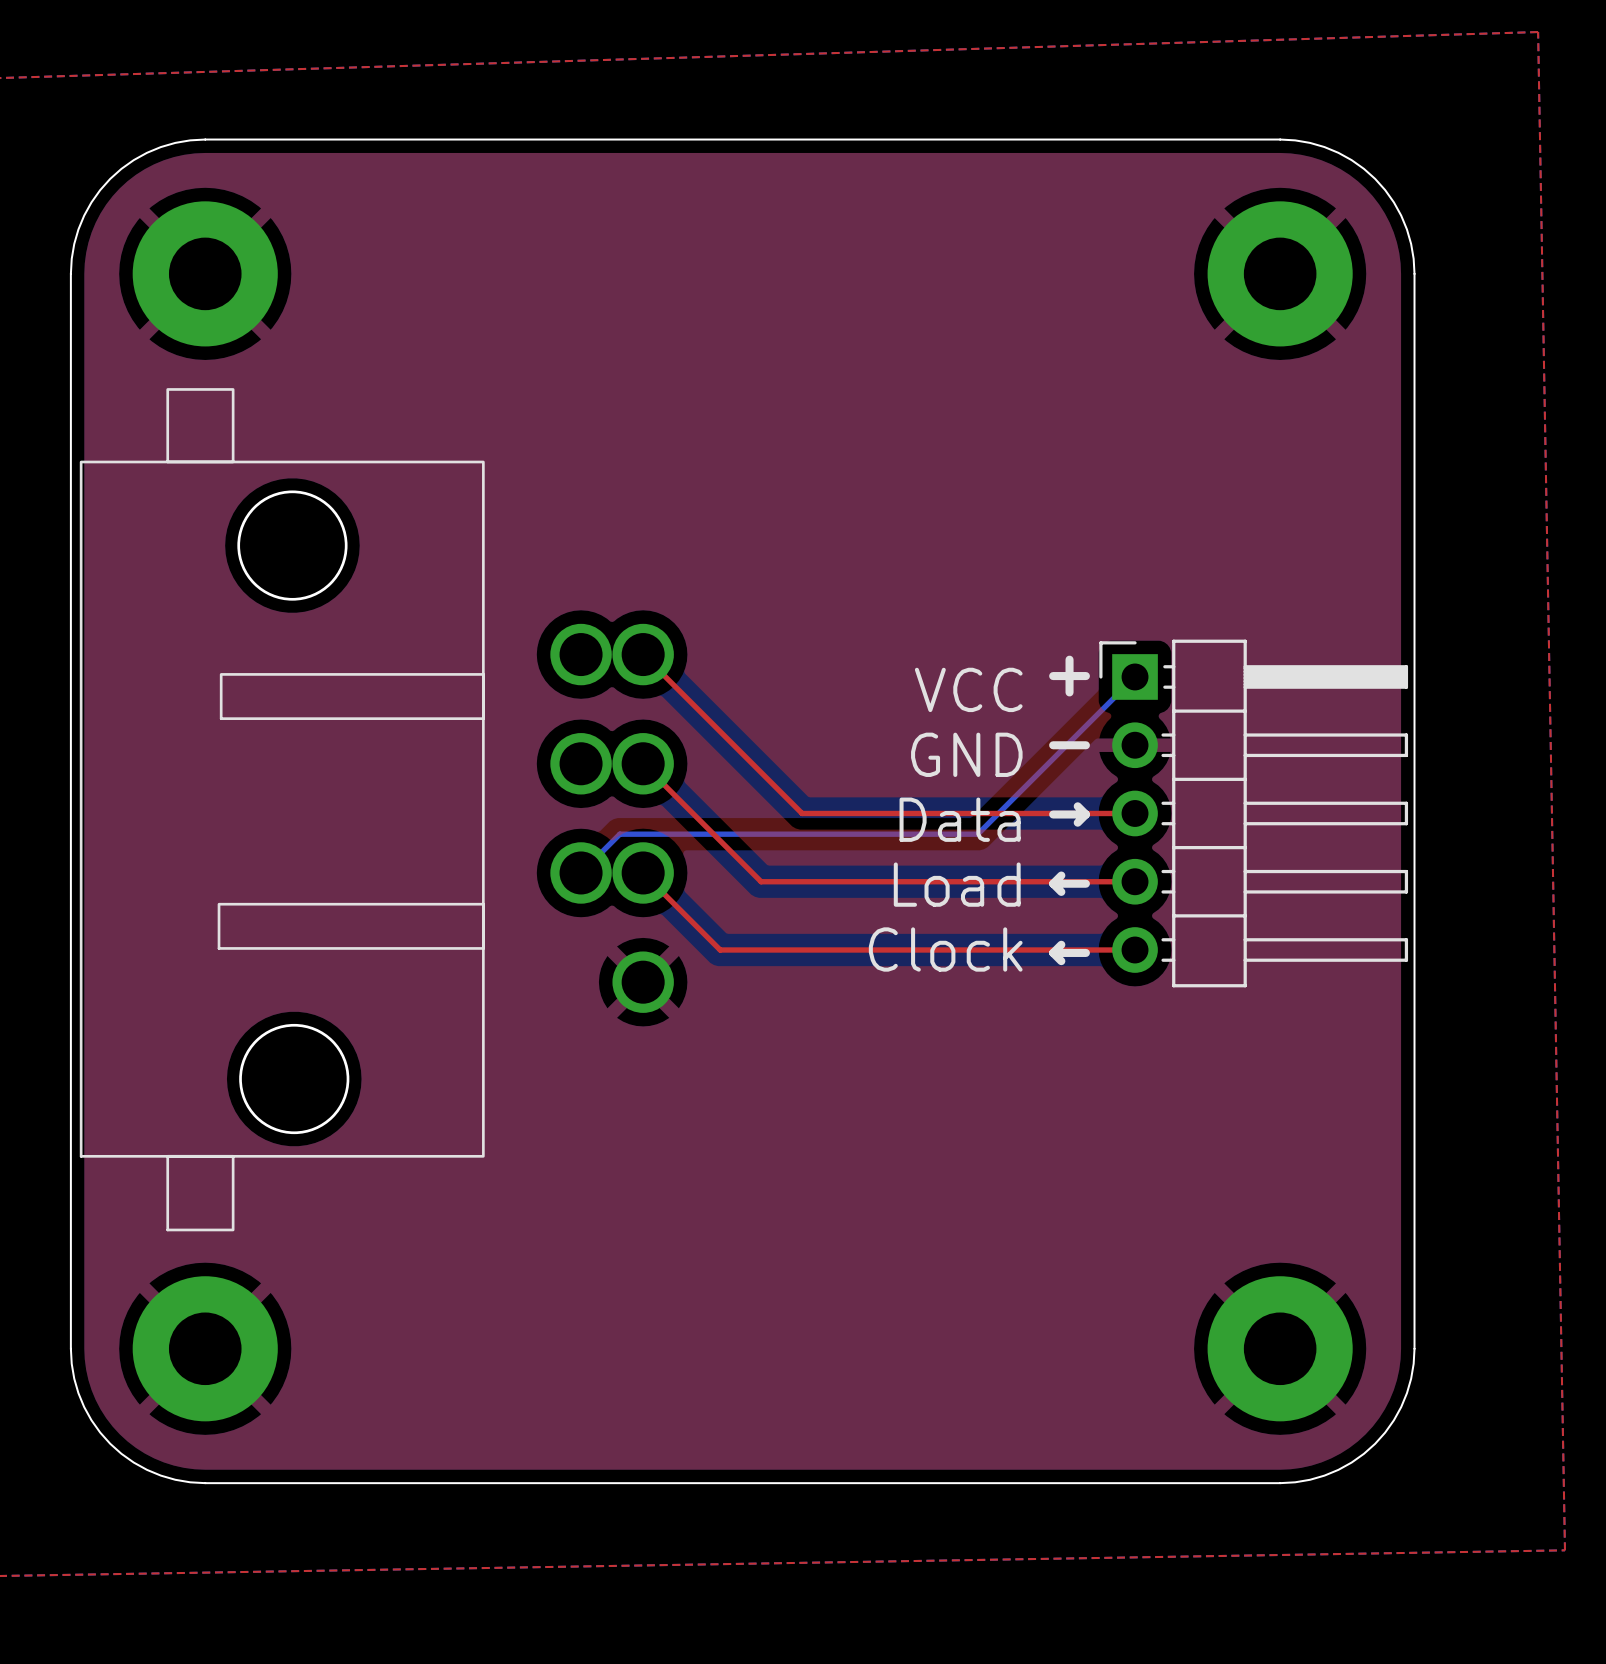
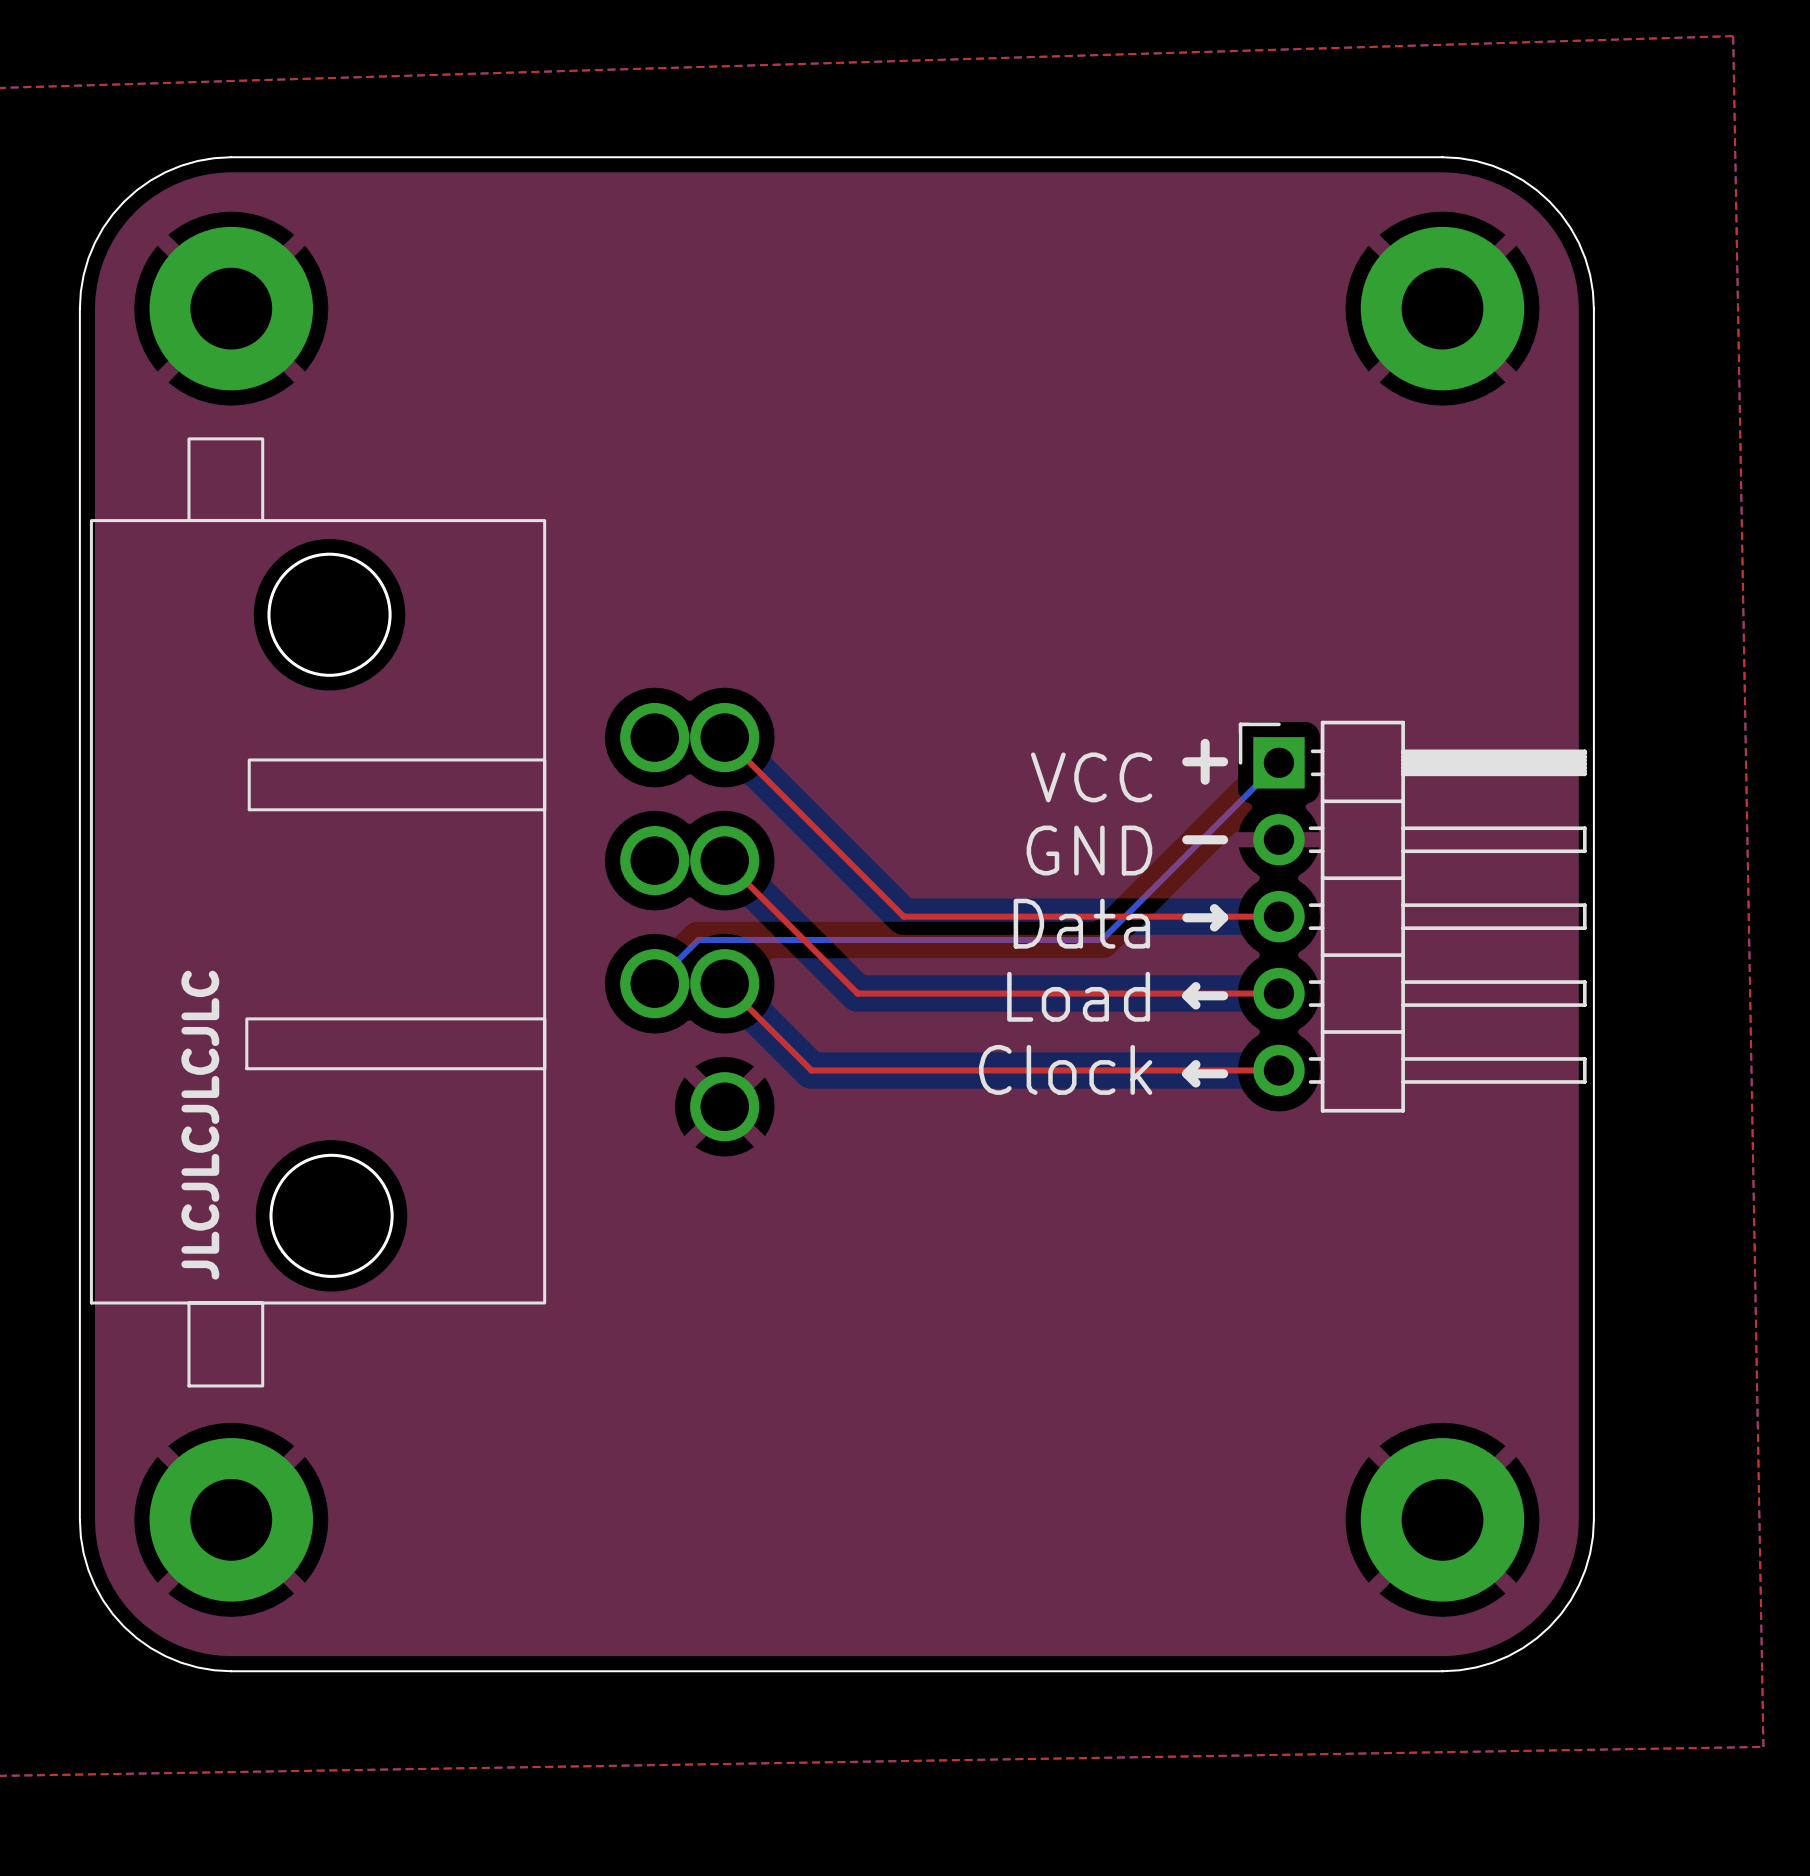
text: none -> JLCJLCJLCJLC (200, 1125)

